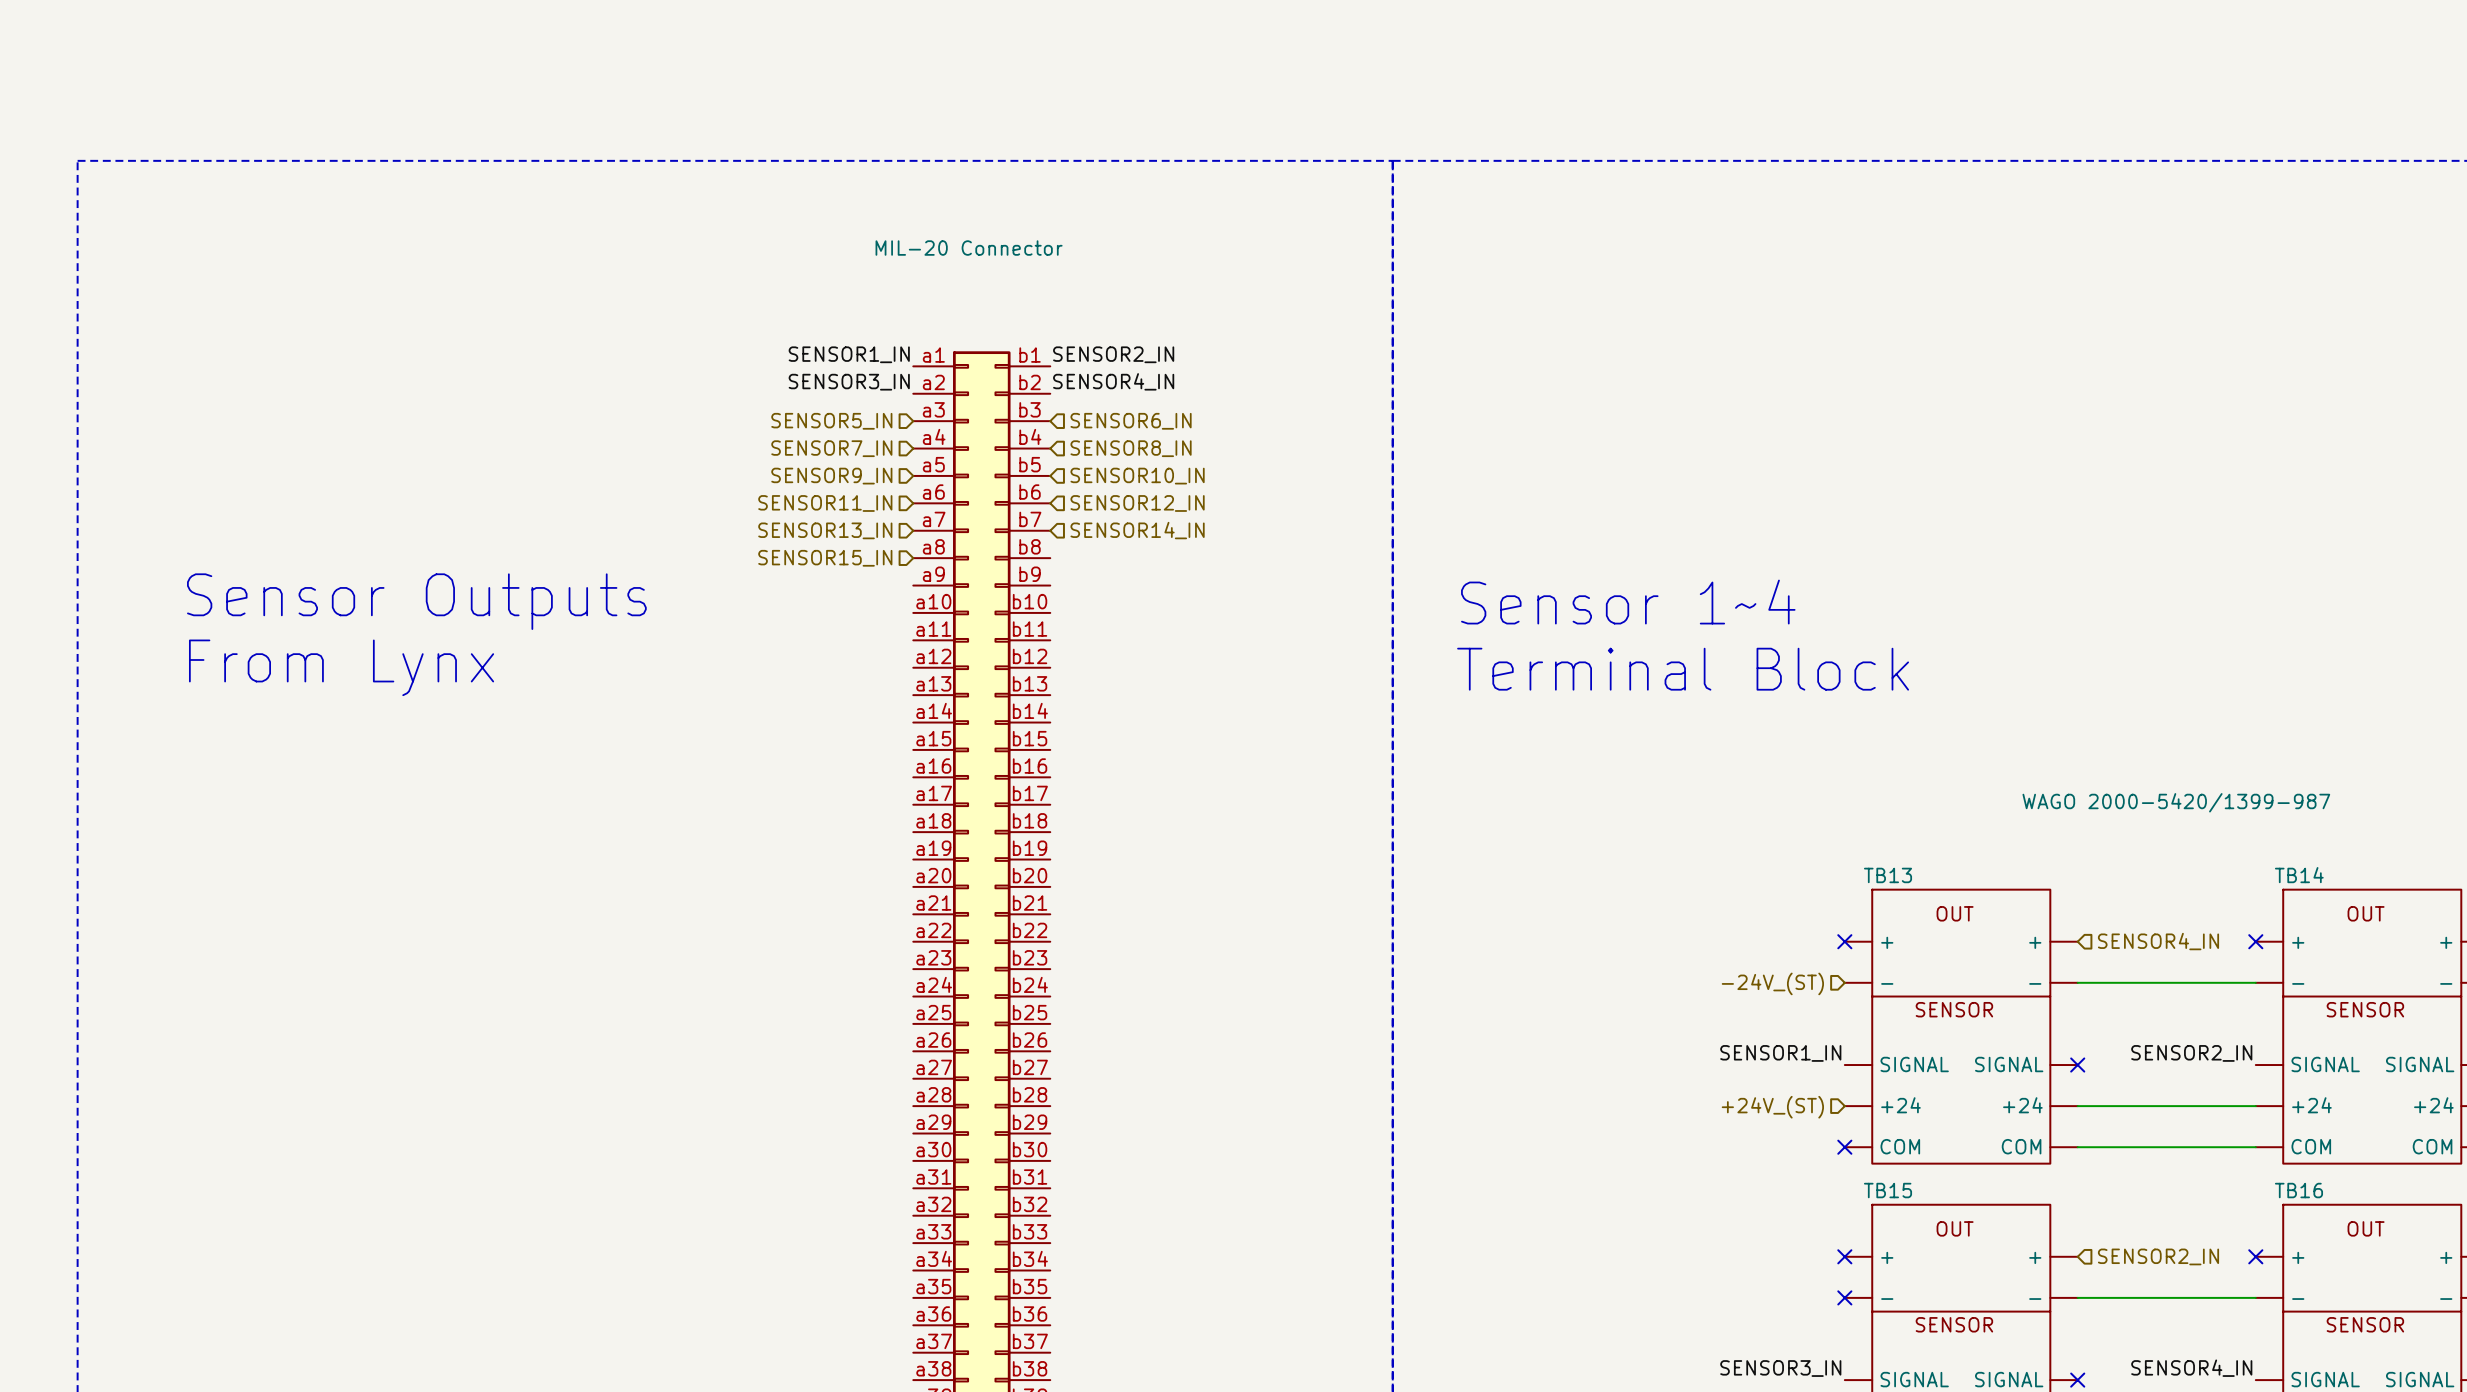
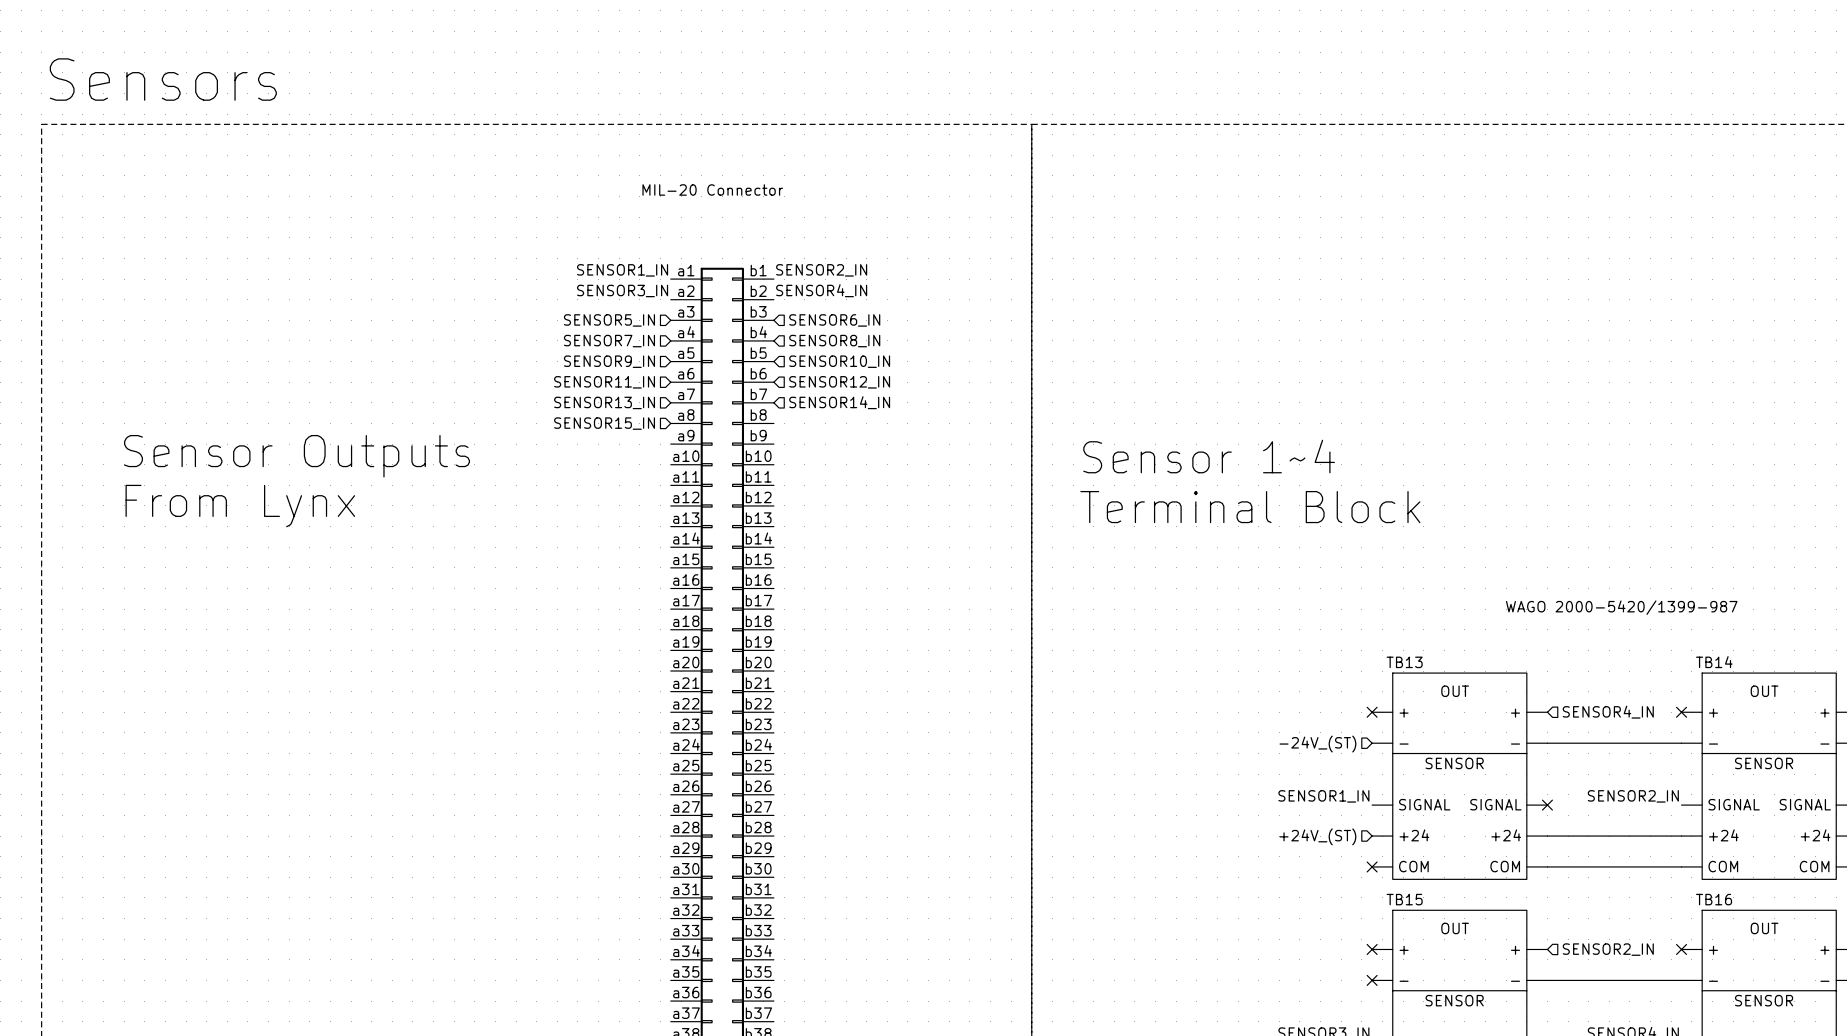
text: none -> Sensors (163, 79)

